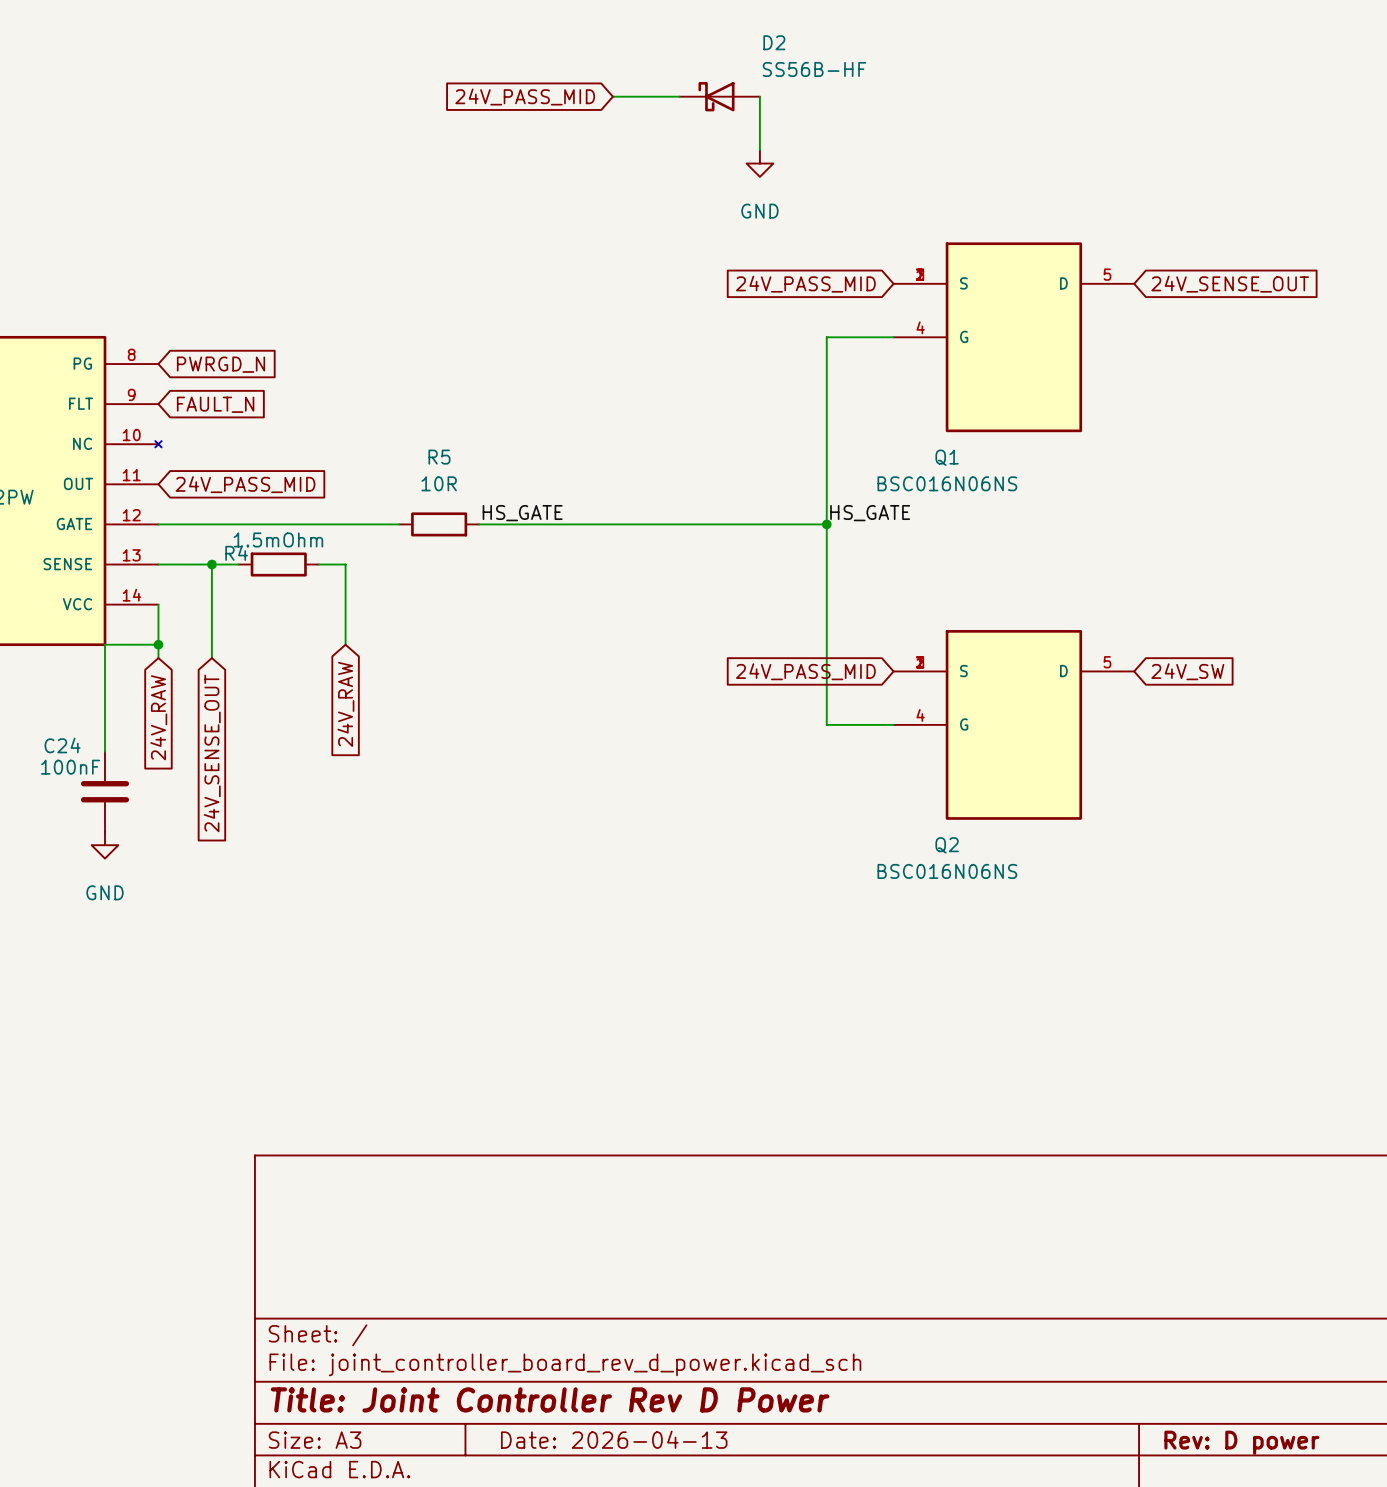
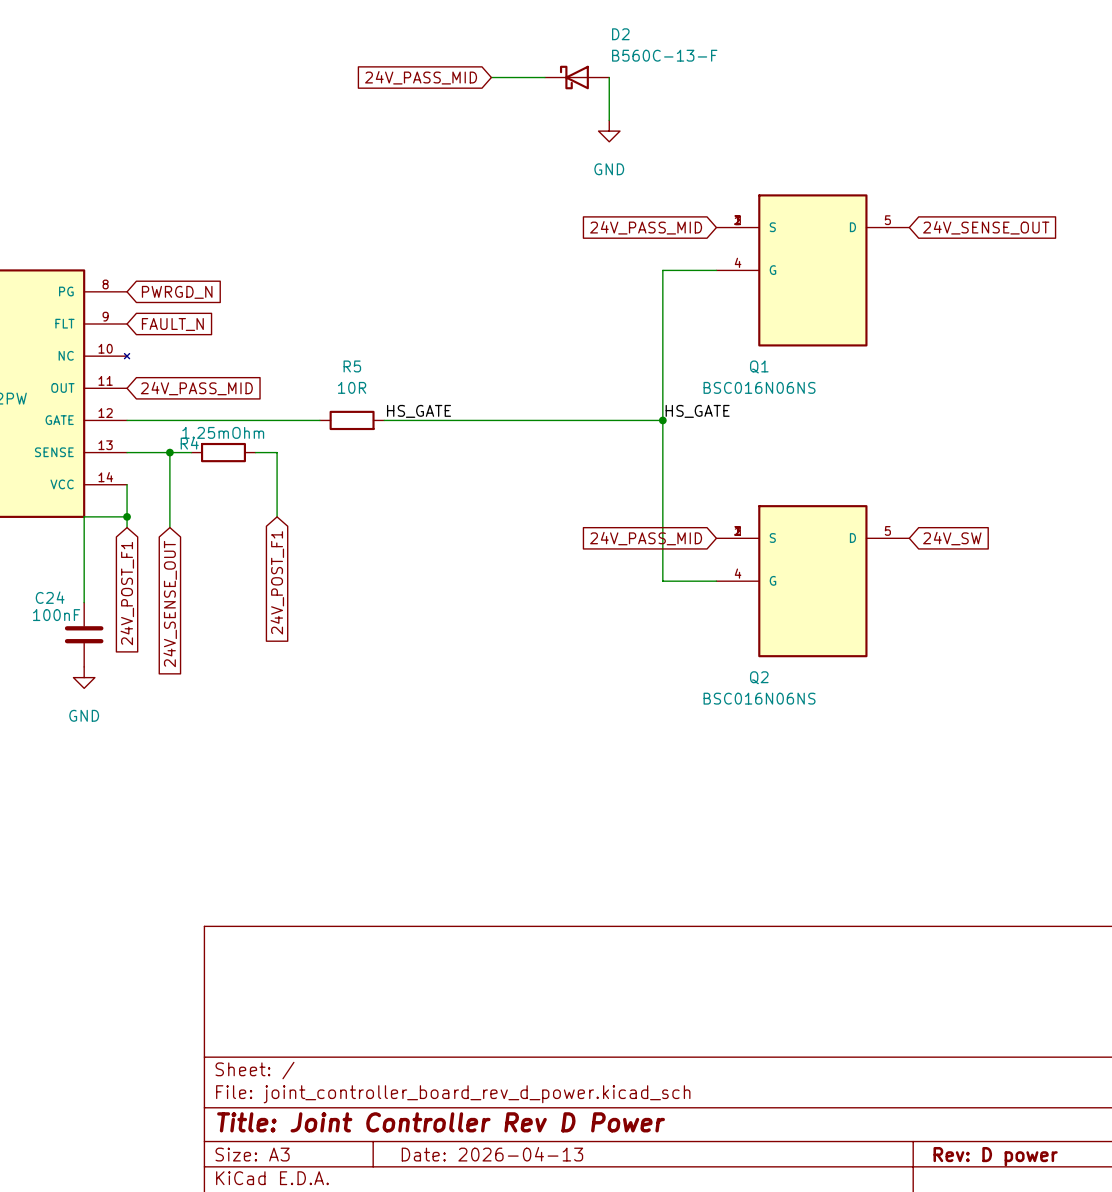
D2 value: SS56B-HF (814, 69) -> B560C-13-F (664, 55)
R4 value: 1.5mOhm (278, 539) -> 1.25mOhm (223, 432)
global label: 24V_RAW (345, 704) -> 24V_POST_F1 (277, 582)
global label: 24V_RAW (158, 717) -> 24V_POST_F1 (127, 593)

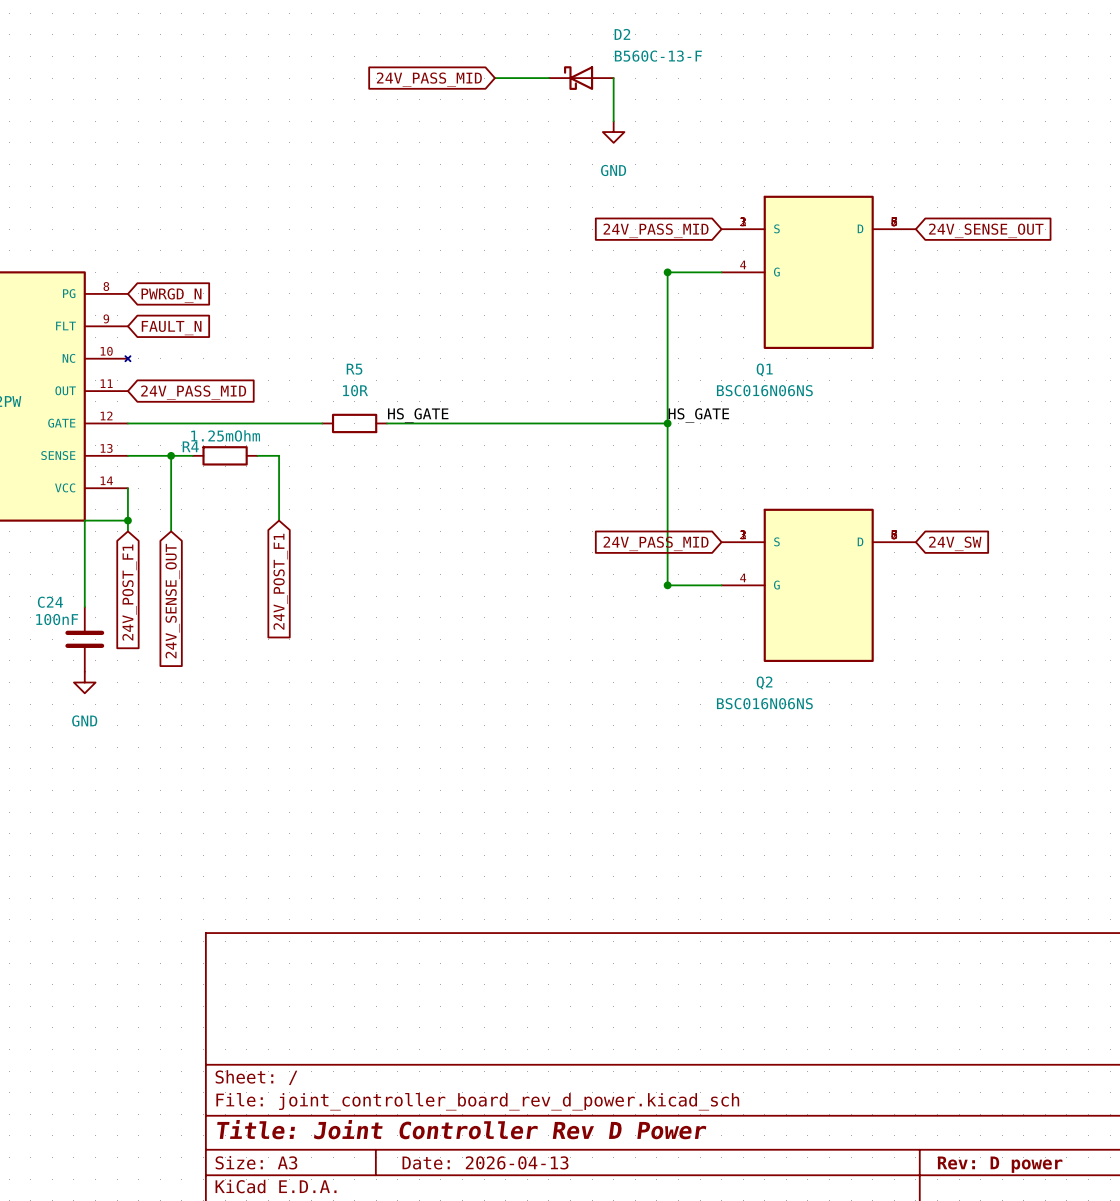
Q1 symbol: [716, 194, 910, 347] -> [721, 195, 916, 349]
junction: none -> (667, 272)
Q2 symbol: [716, 505, 910, 658] -> [721, 508, 916, 663]
junction: none -> (667, 585)

